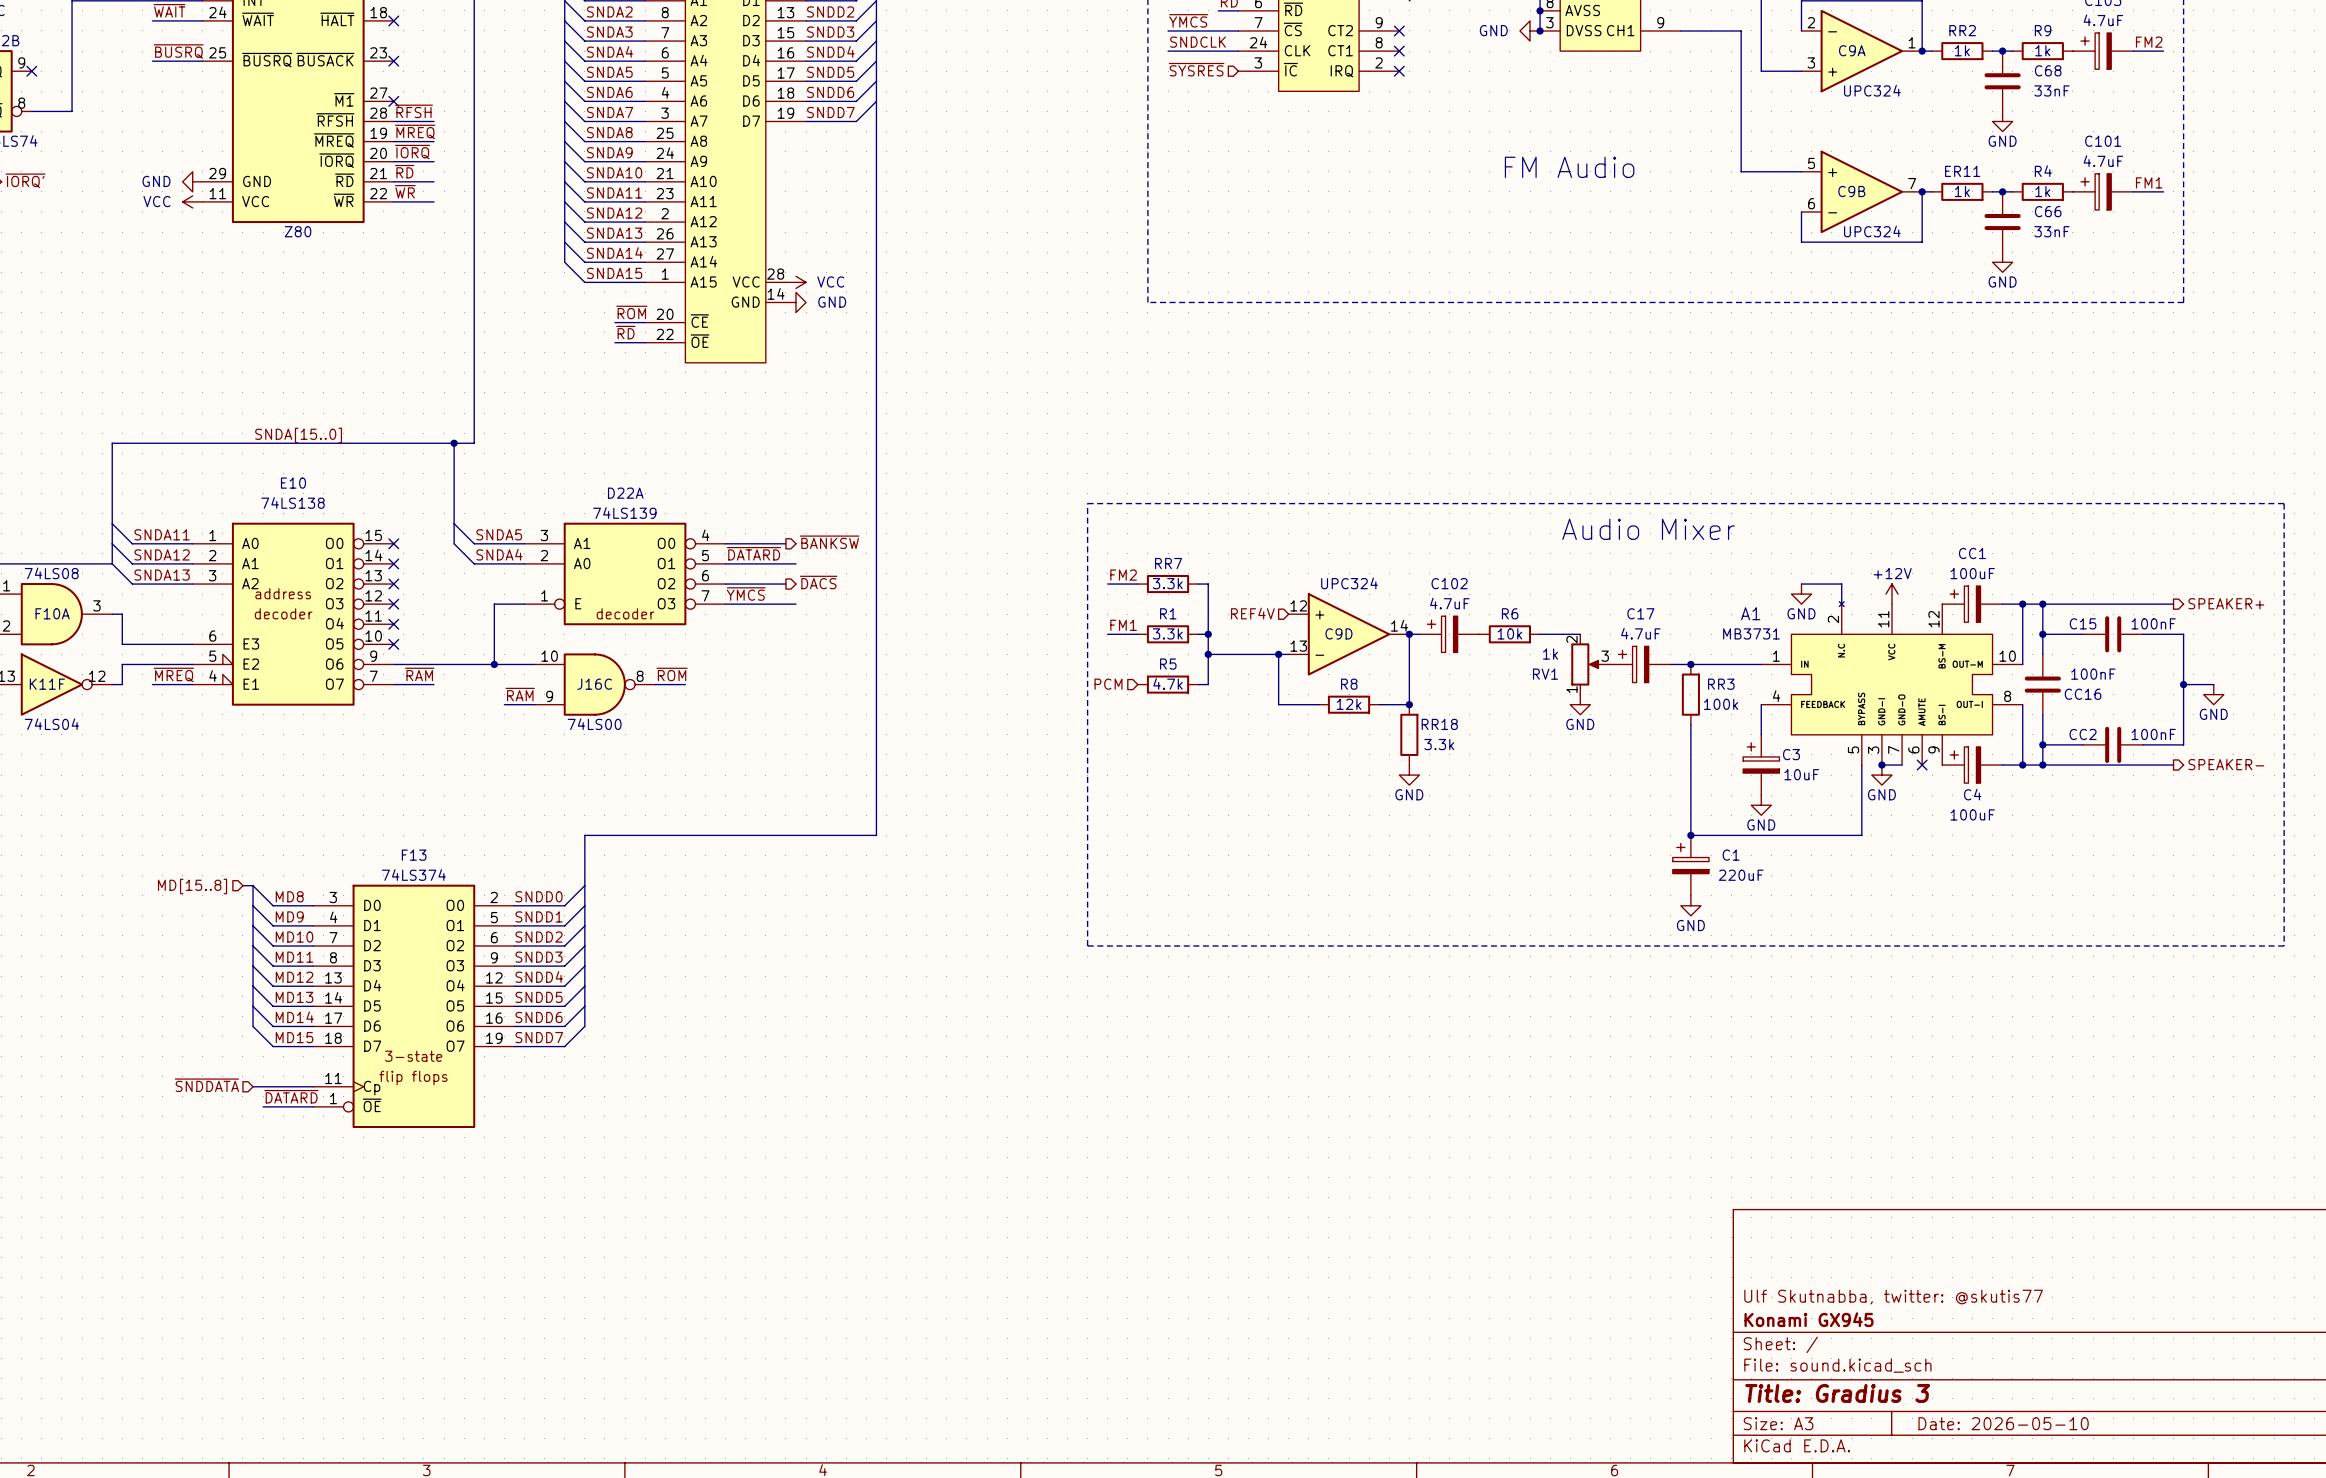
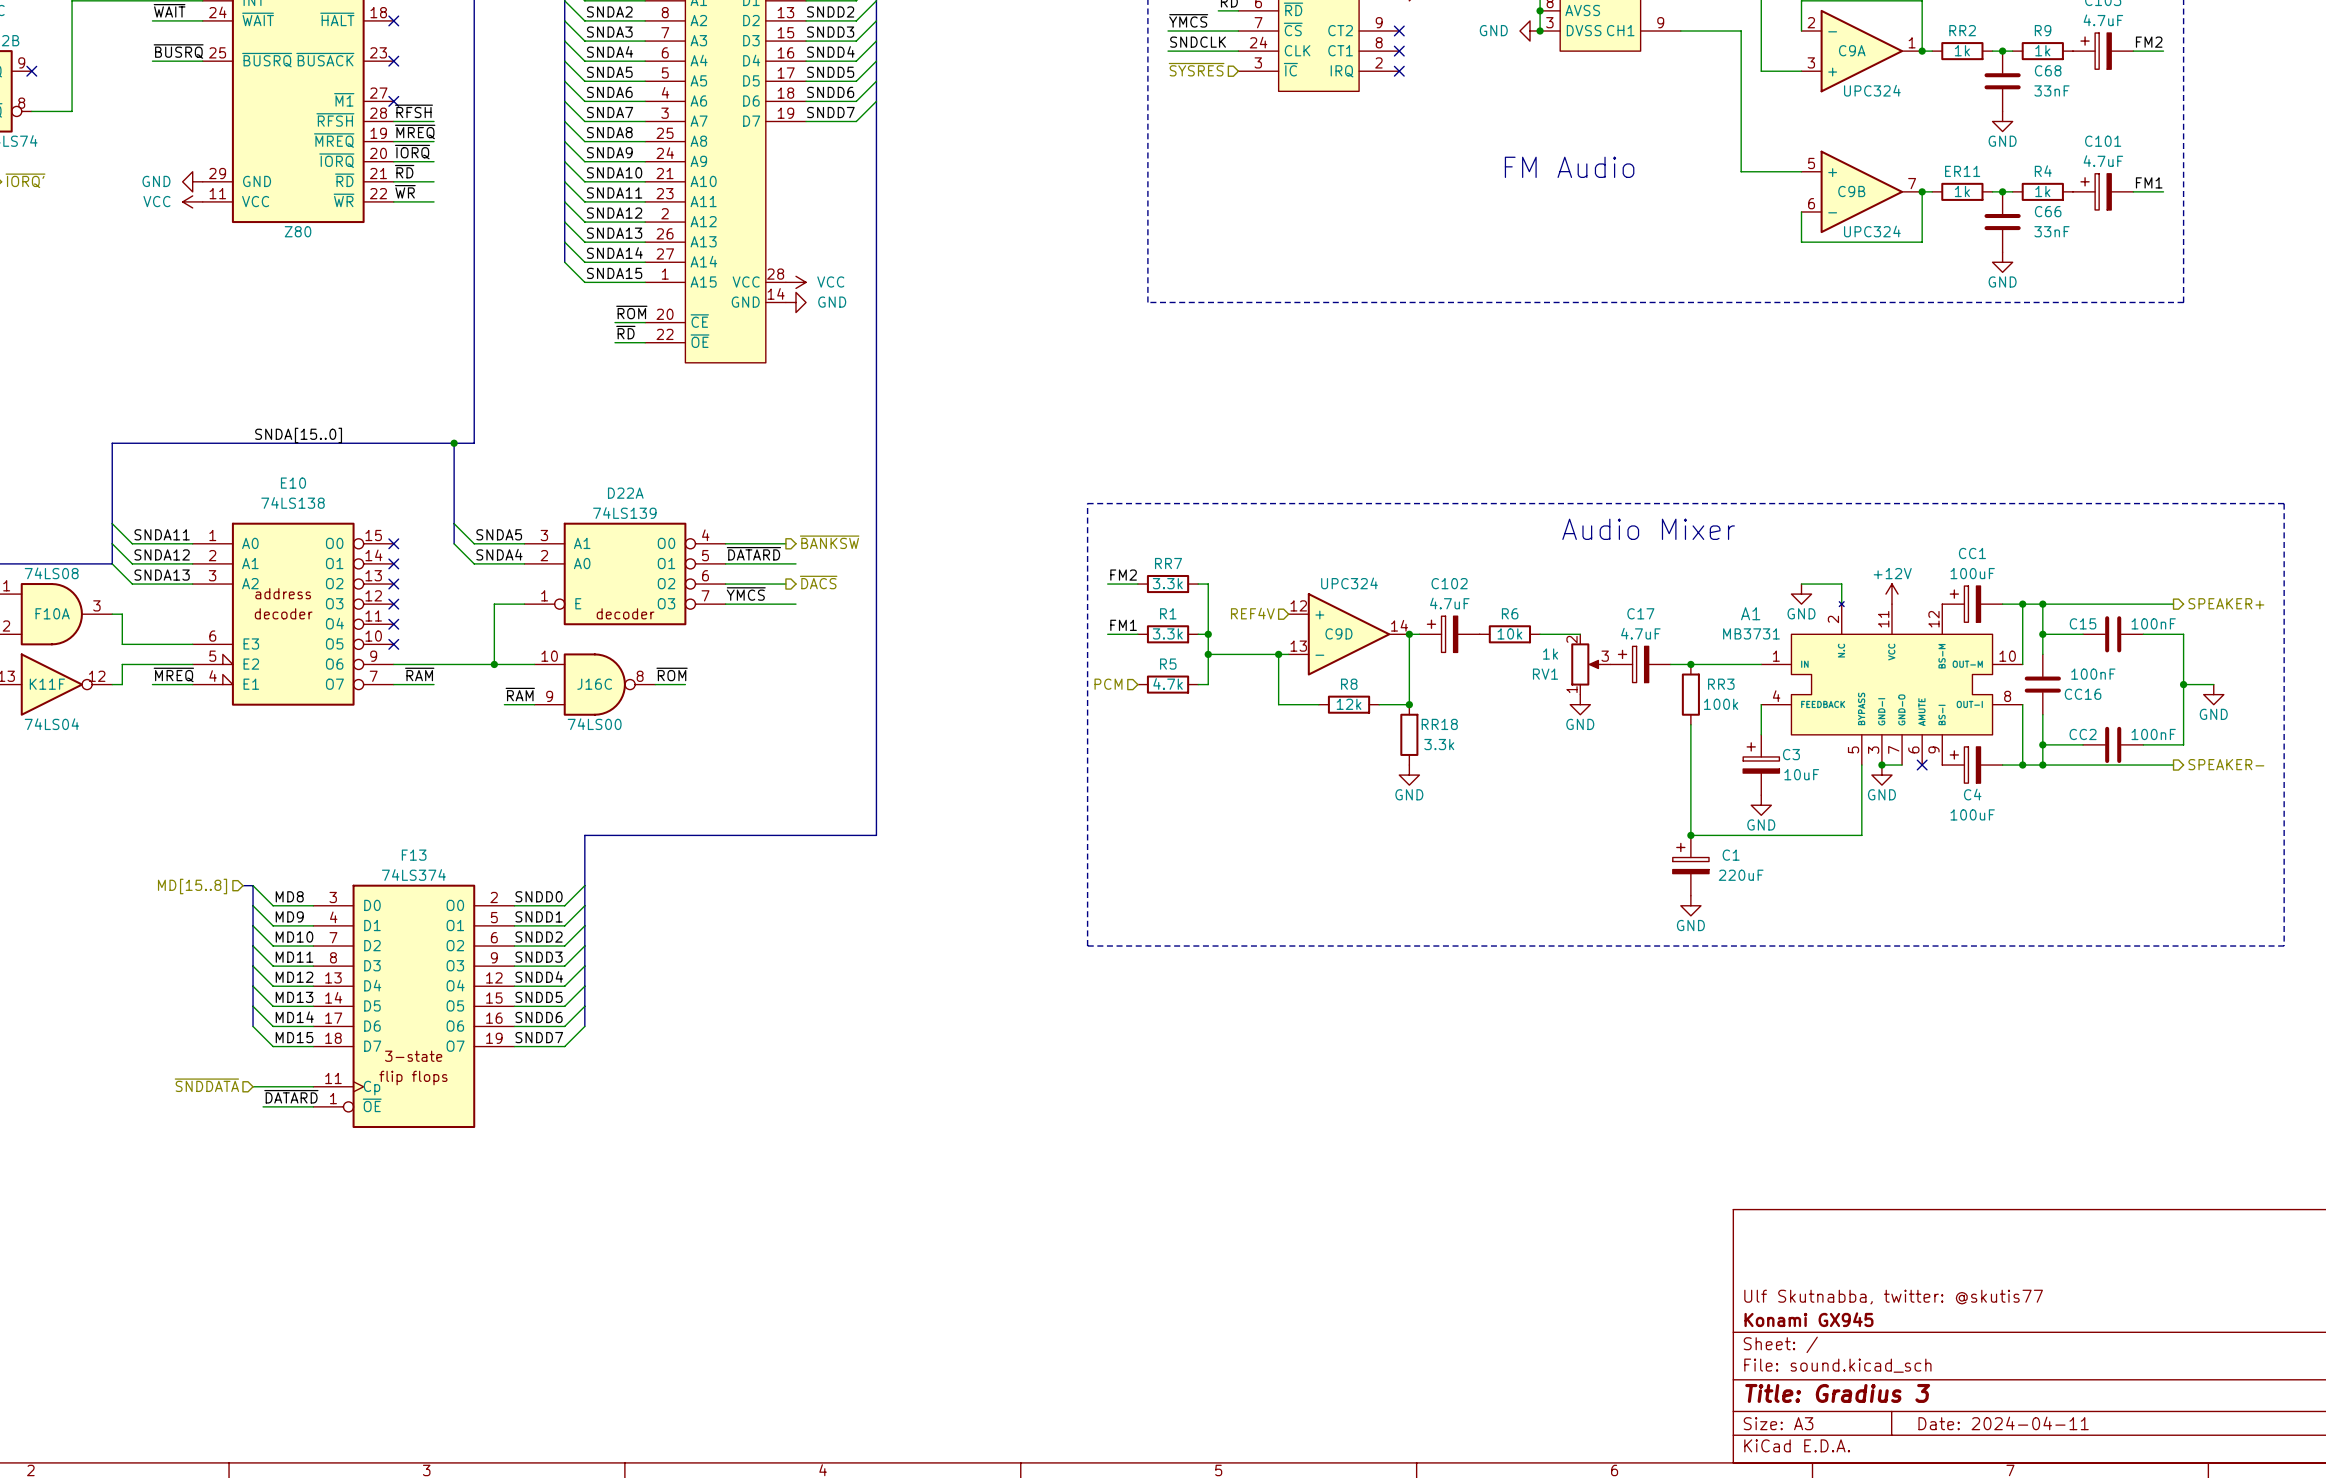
title block: Date: 2026-05-10 (2003, 1423) -> Date: 2024-04-11 (2003, 1423)

